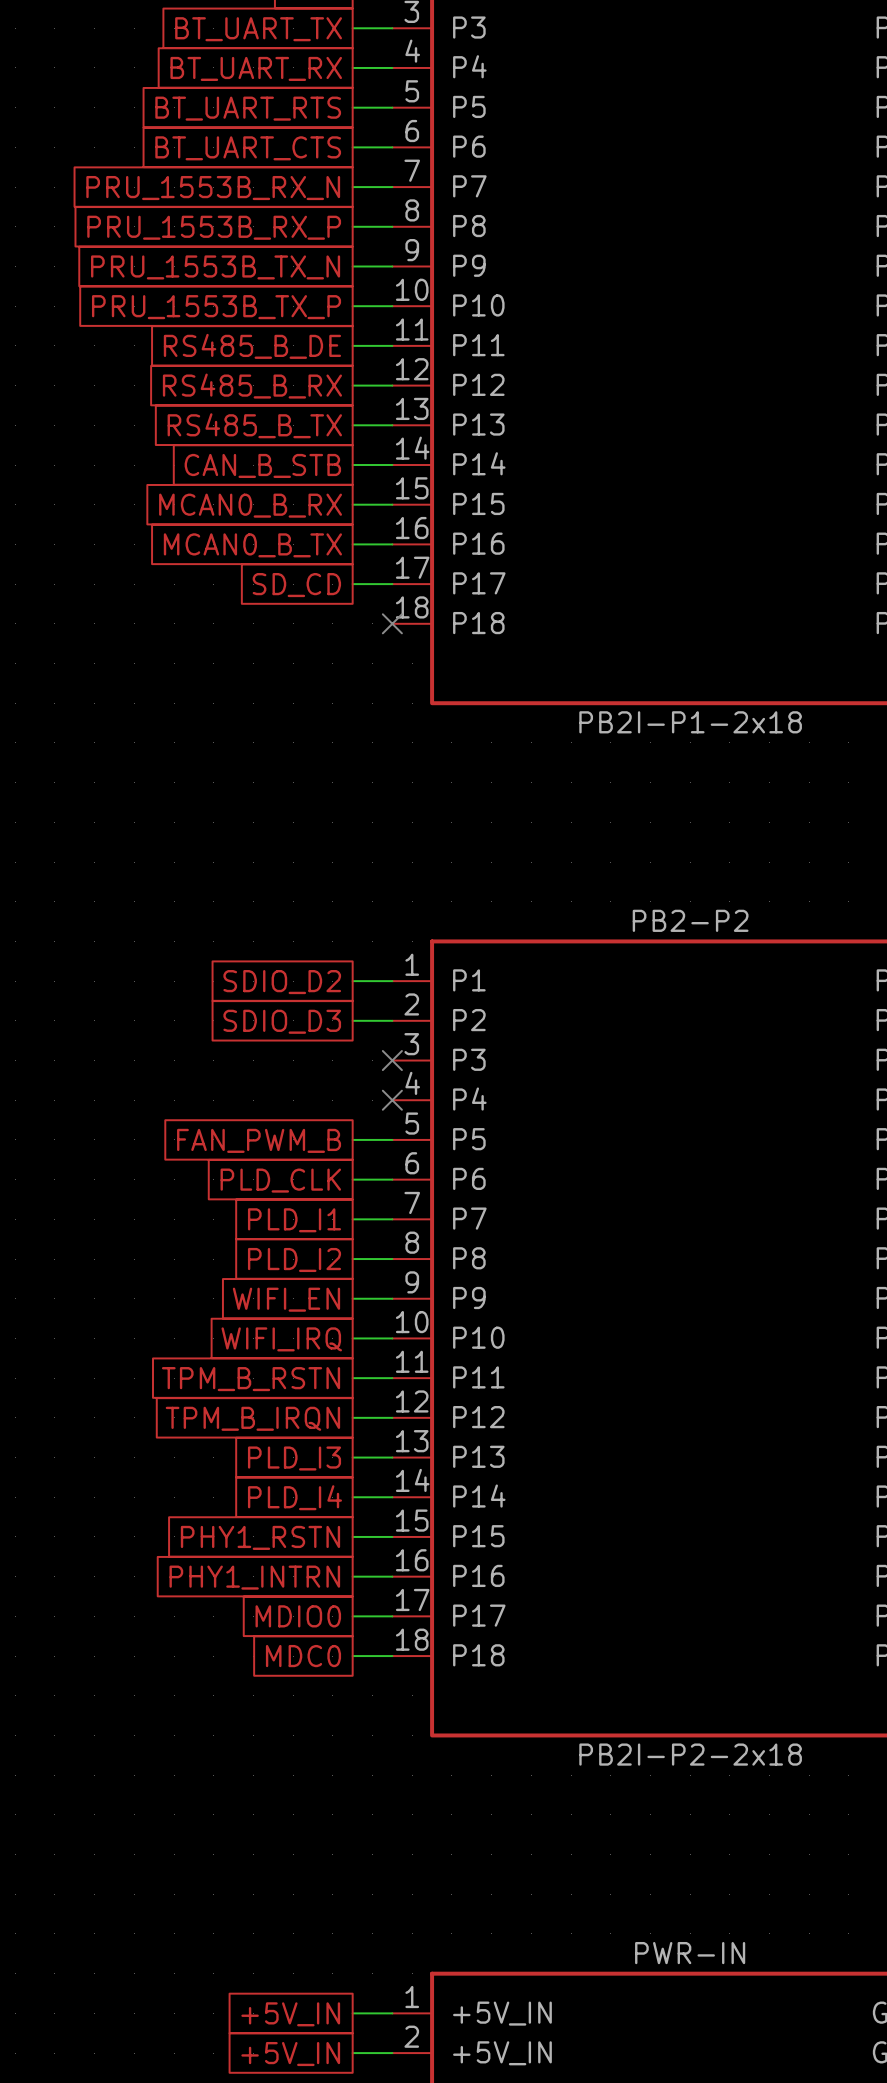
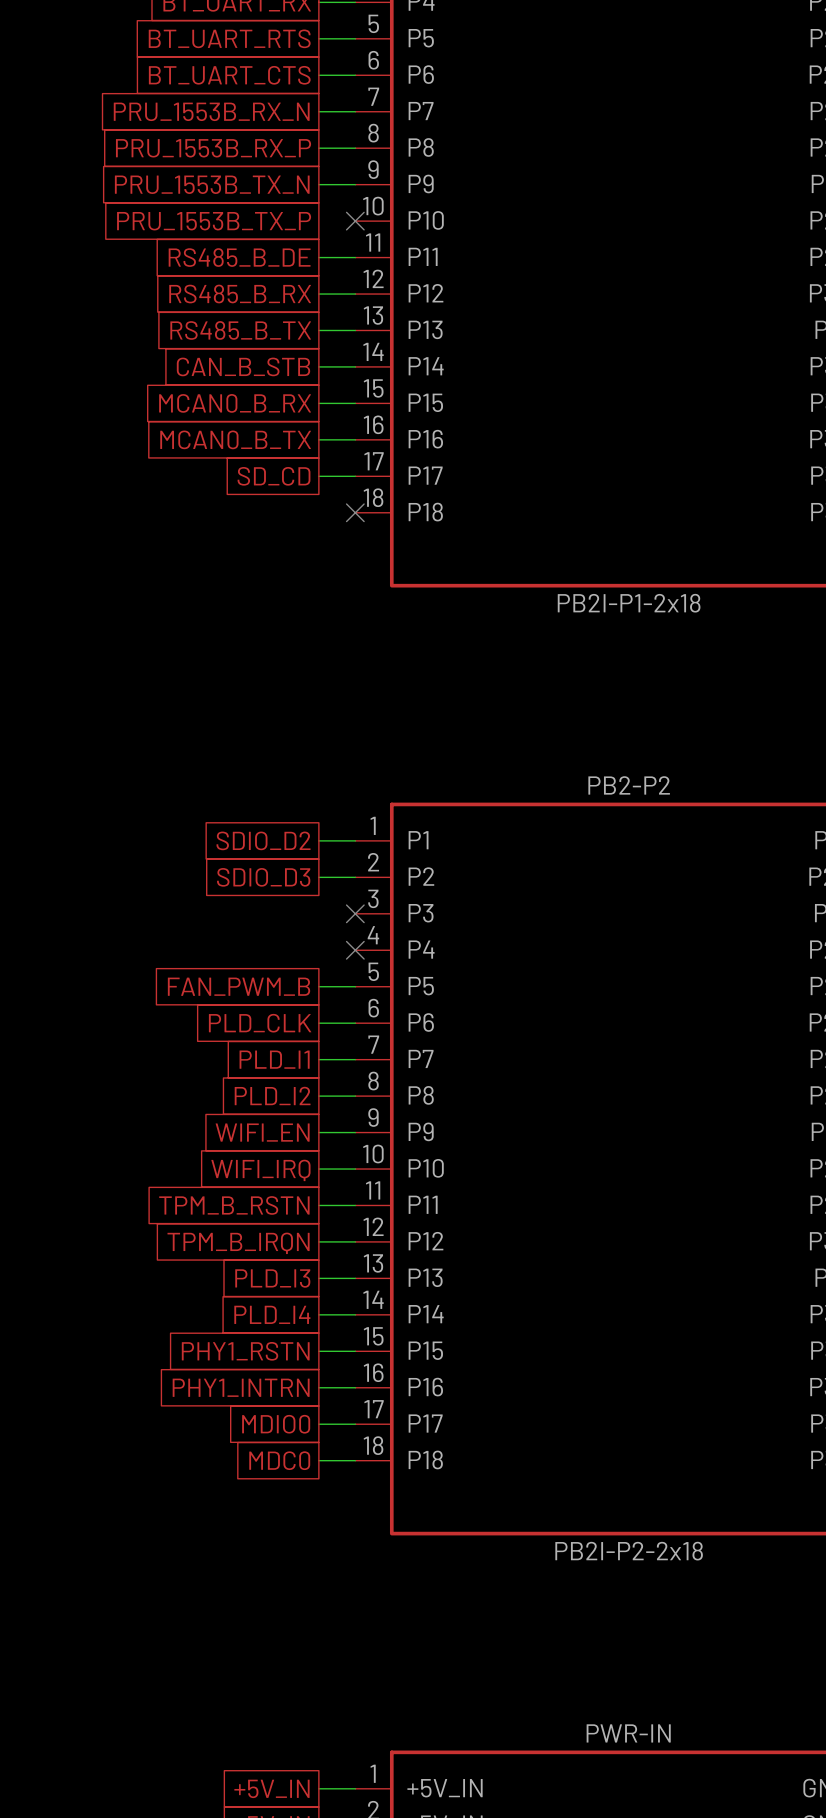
wire: (352, 306) (392, 306) -> none
no-connect mark: none -> (355, 221)

